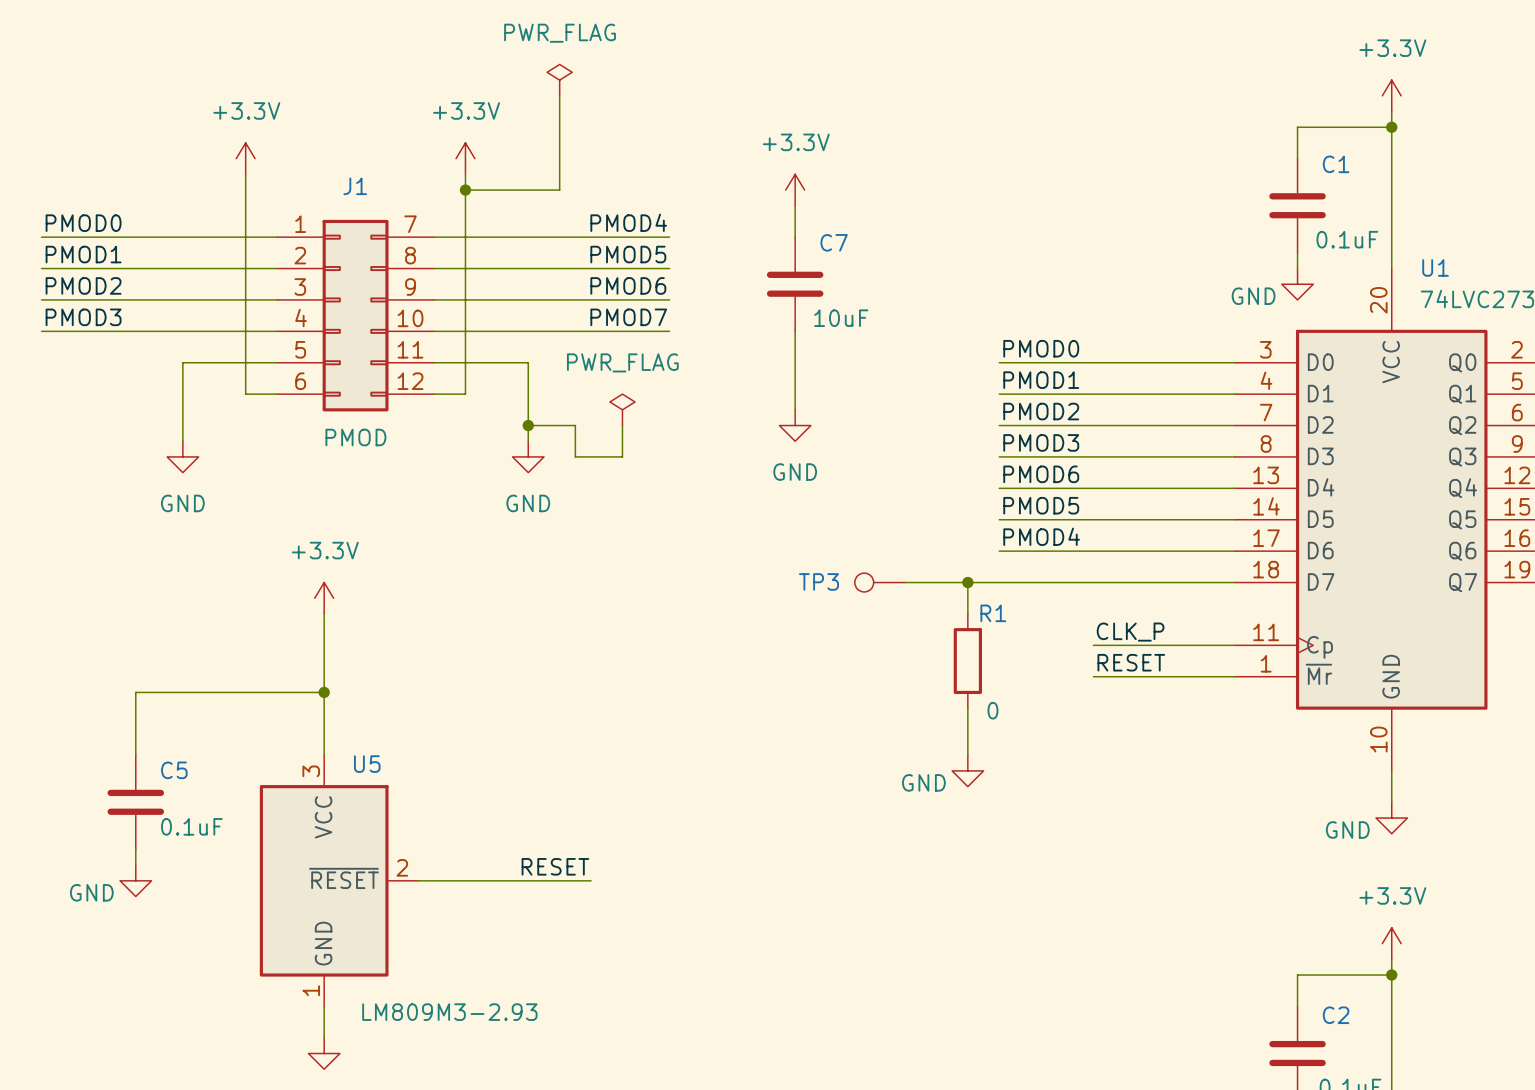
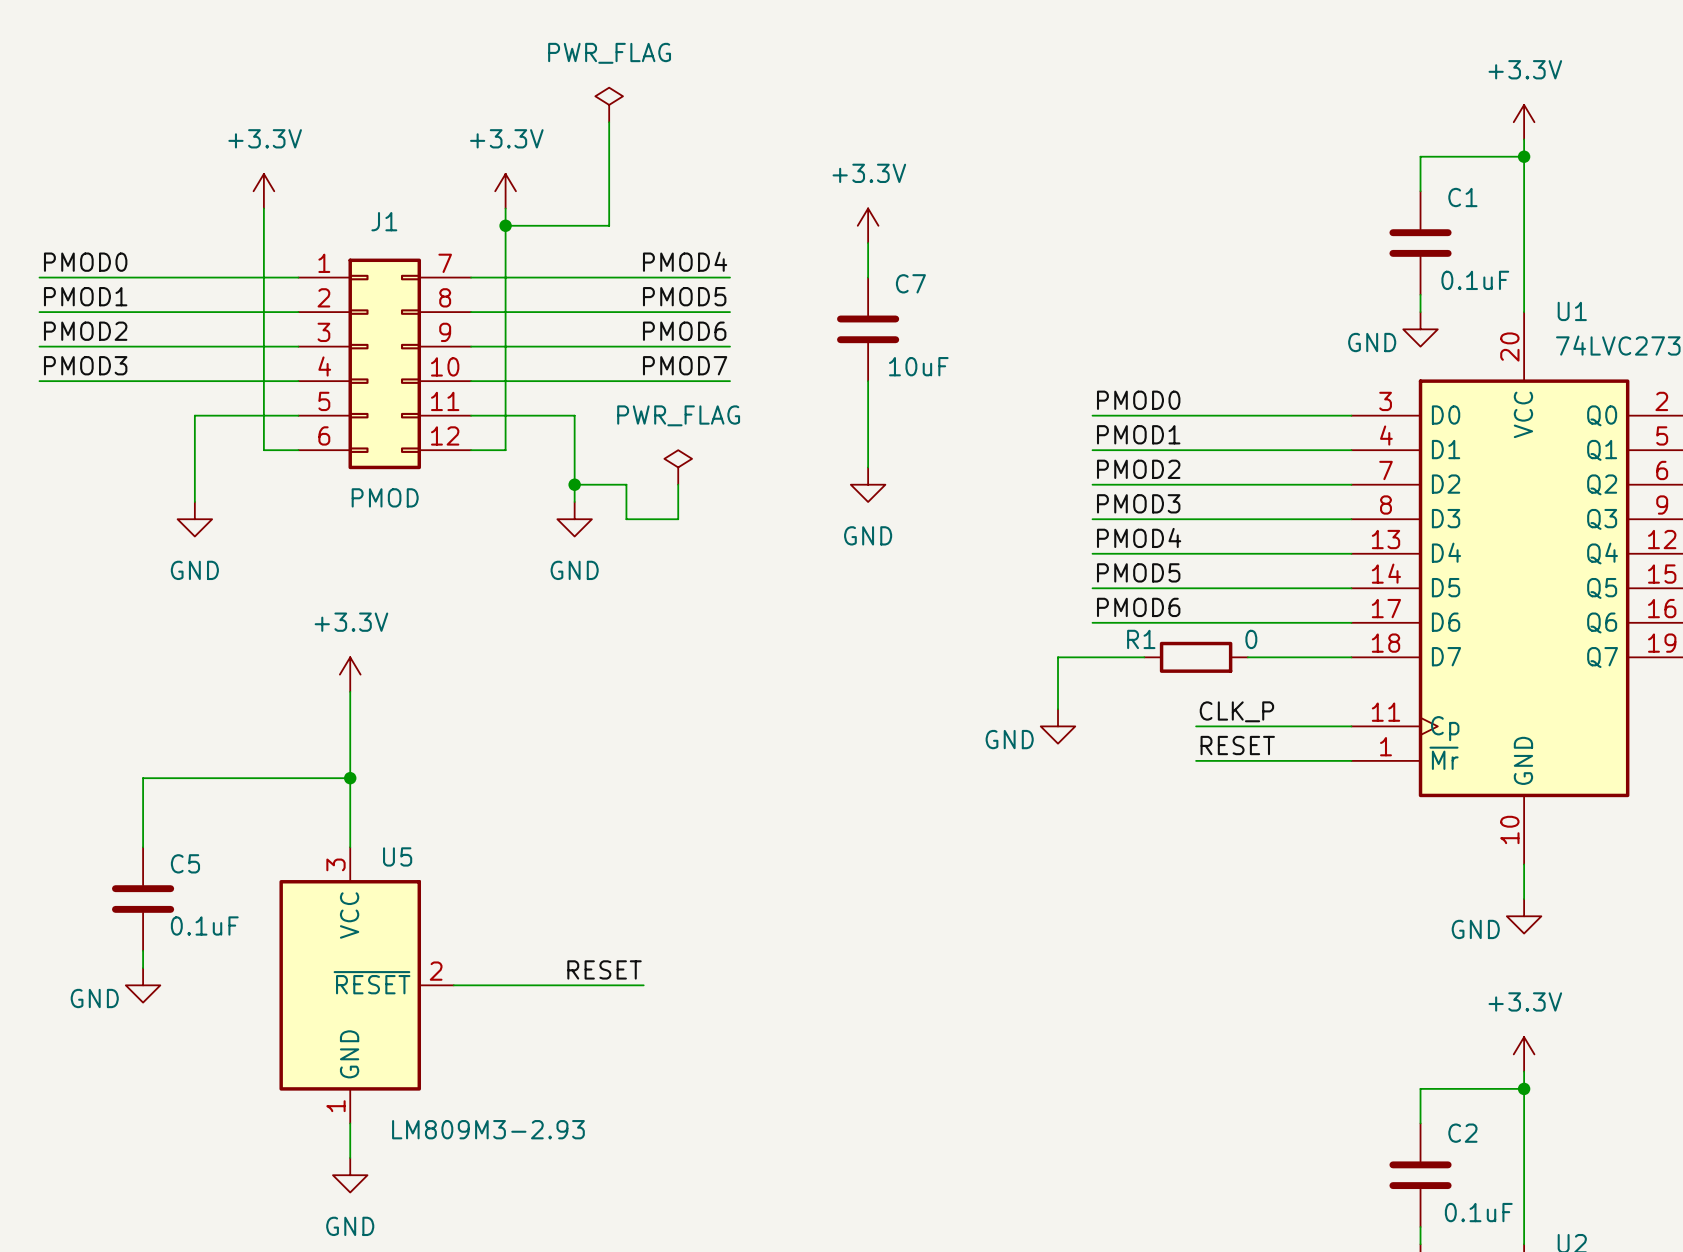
label: PMOD6 (1041, 474) -> PMOD4 (1139, 537)
label: PMOD4 (1041, 536) -> PMOD6 (1138, 607)
TP3: (879, 582) -> none
wire: (905, 582) (967, 582) -> none
junction: (967, 582) -> none
wire: (1046, 582) (1140, 582) -> none
R1 name position: R1 (993, 613) -> R1 (1141, 639)
R1 rotation: 0° (967, 661) -> 90° clockwise (1196, 657)
R1 position: (967, 661) -> (1196, 657)
wire: (967, 708) (967, 755) -> none
R1 value position: 0 (992, 710) -> 0 (1251, 639)
power symbol position: GND (967, 770) -> GND (1058, 726)

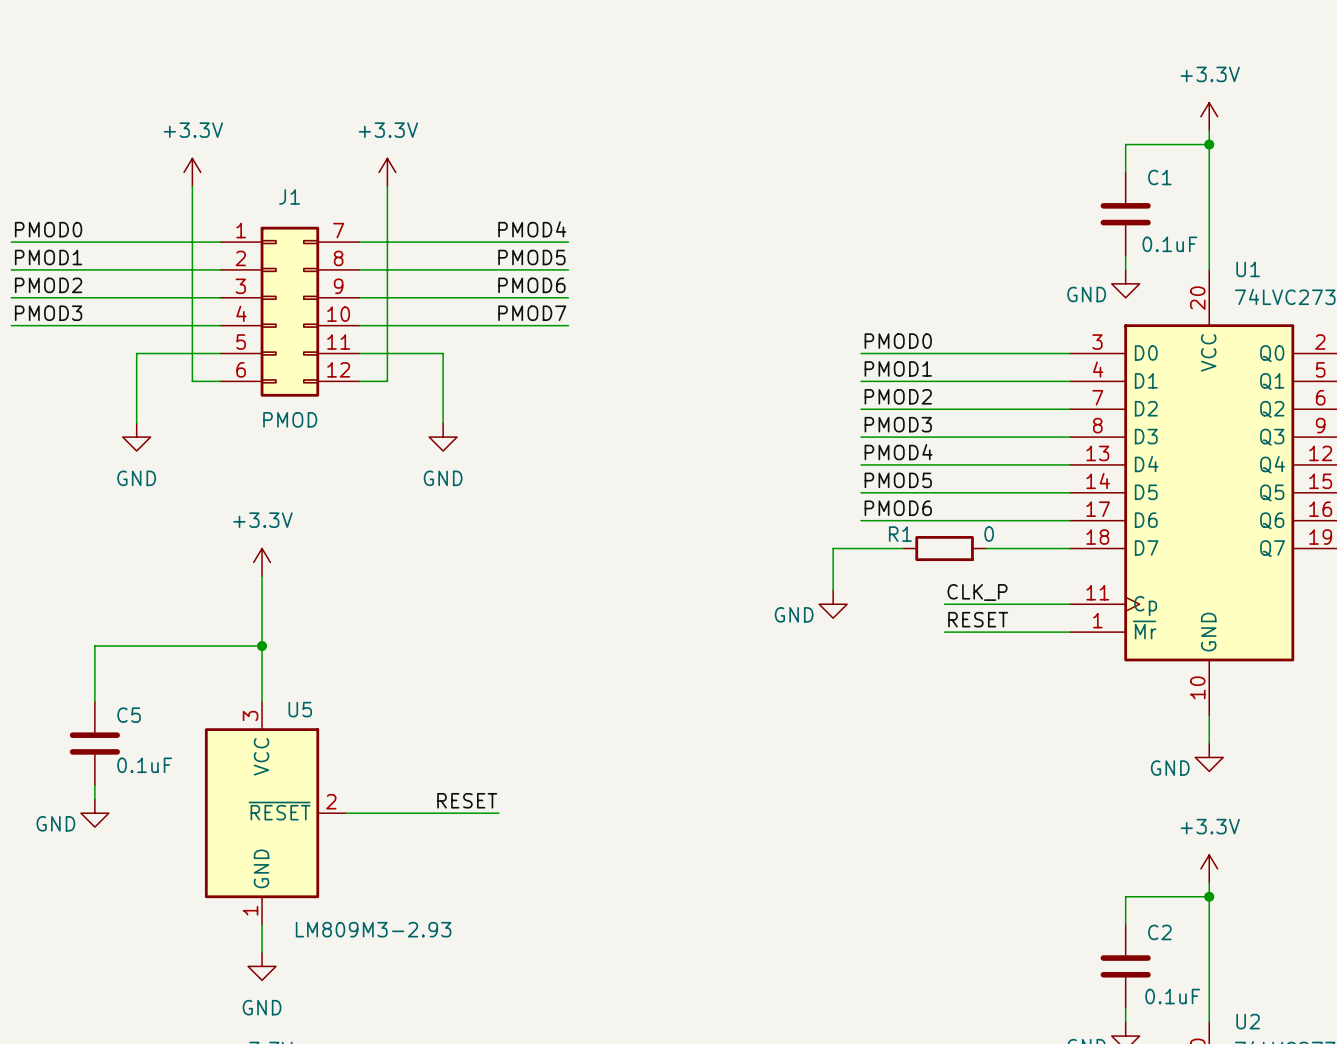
power symbol: PWR_FLAG (609, 104) -> none
wire: (609, 122) (609, 225) (505, 225) -> none
junction: (505, 225) -> none
power symbol: +3.3V (868, 225) -> none
wire: (868, 243) (868, 277) -> none
C7: 10uF (868, 329) -> none
wire: (868, 381) (868, 467) -> none
power symbol: PWR_FLAG (678, 467) -> none
wire: (574, 484) (626, 484) (626, 519) (678, 519) (678, 484) -> none
junction: (574, 484) -> none
power symbol: GND (868, 484) -> none

